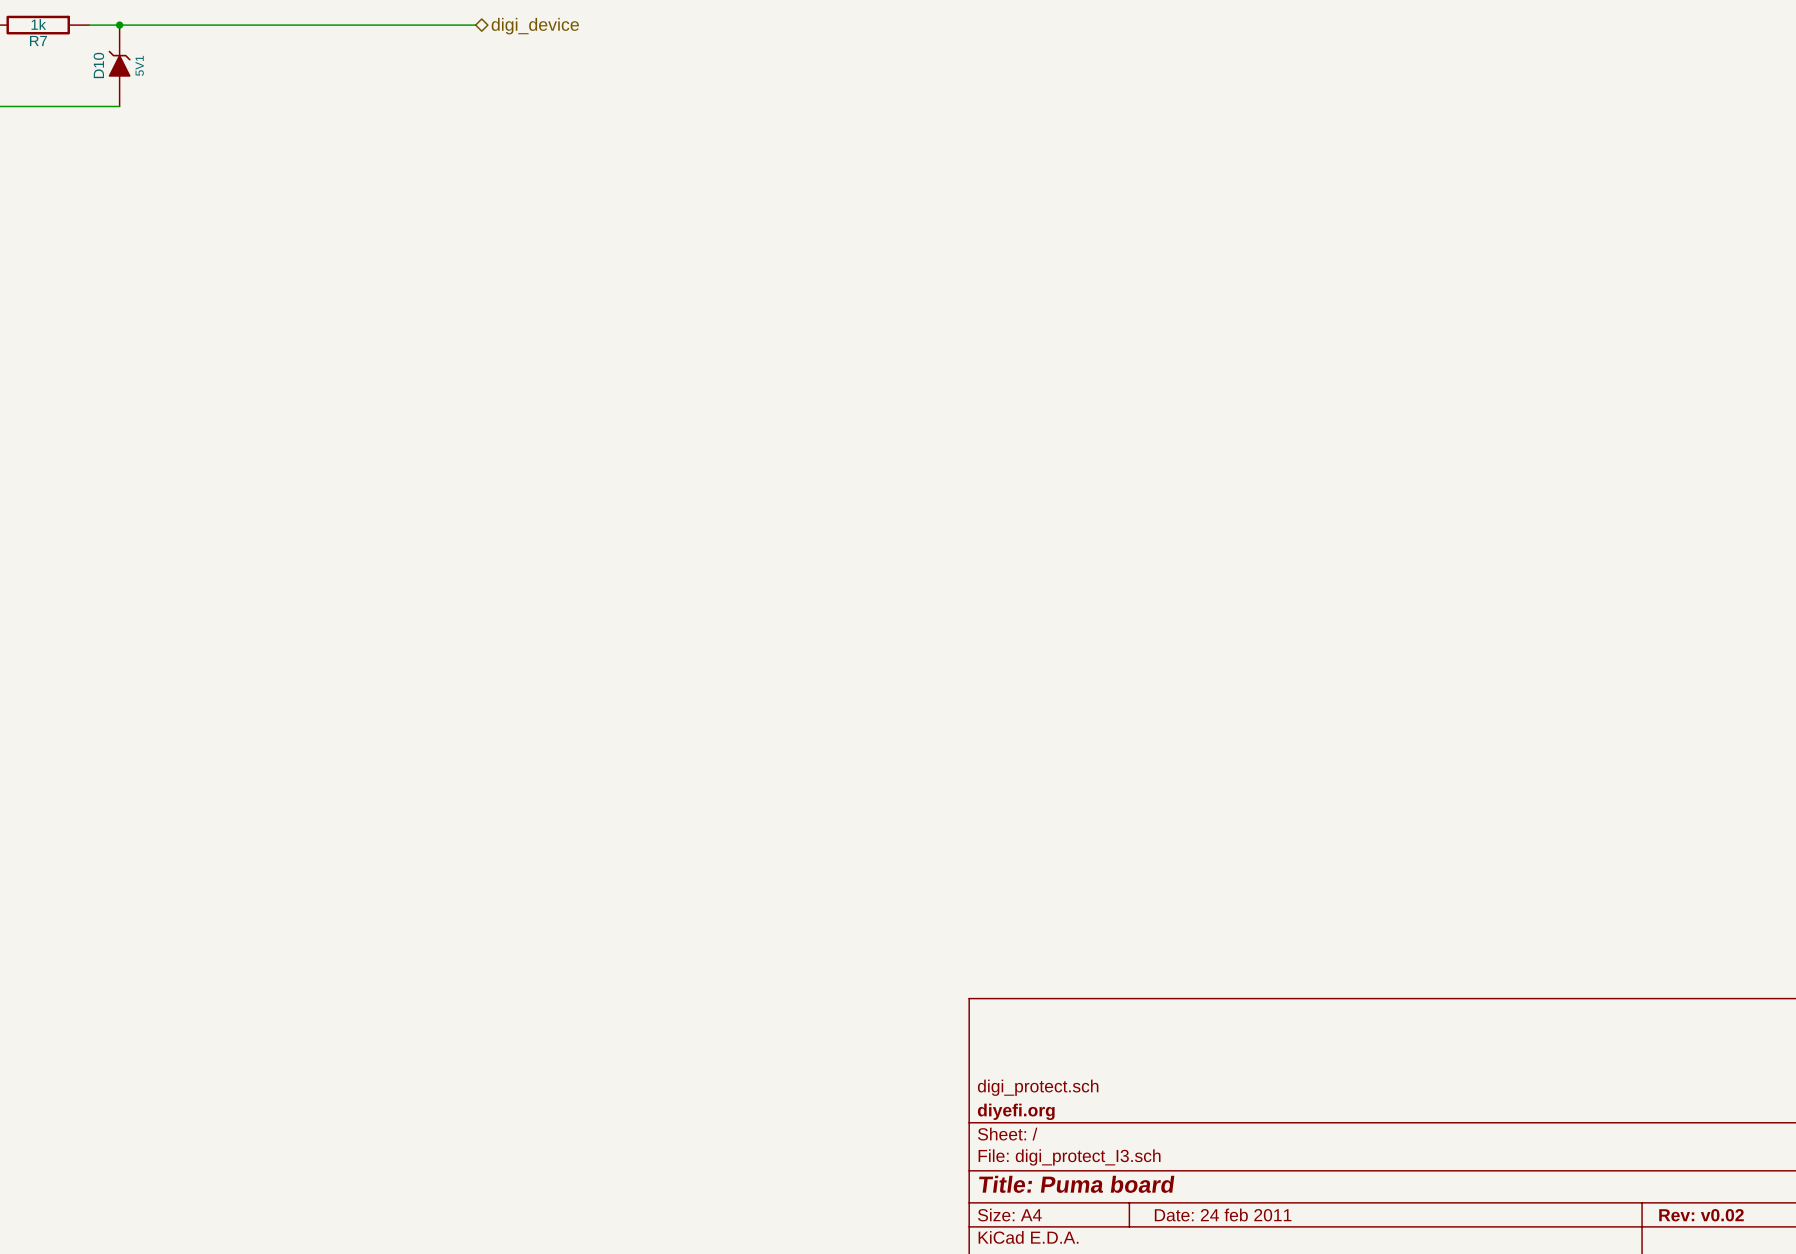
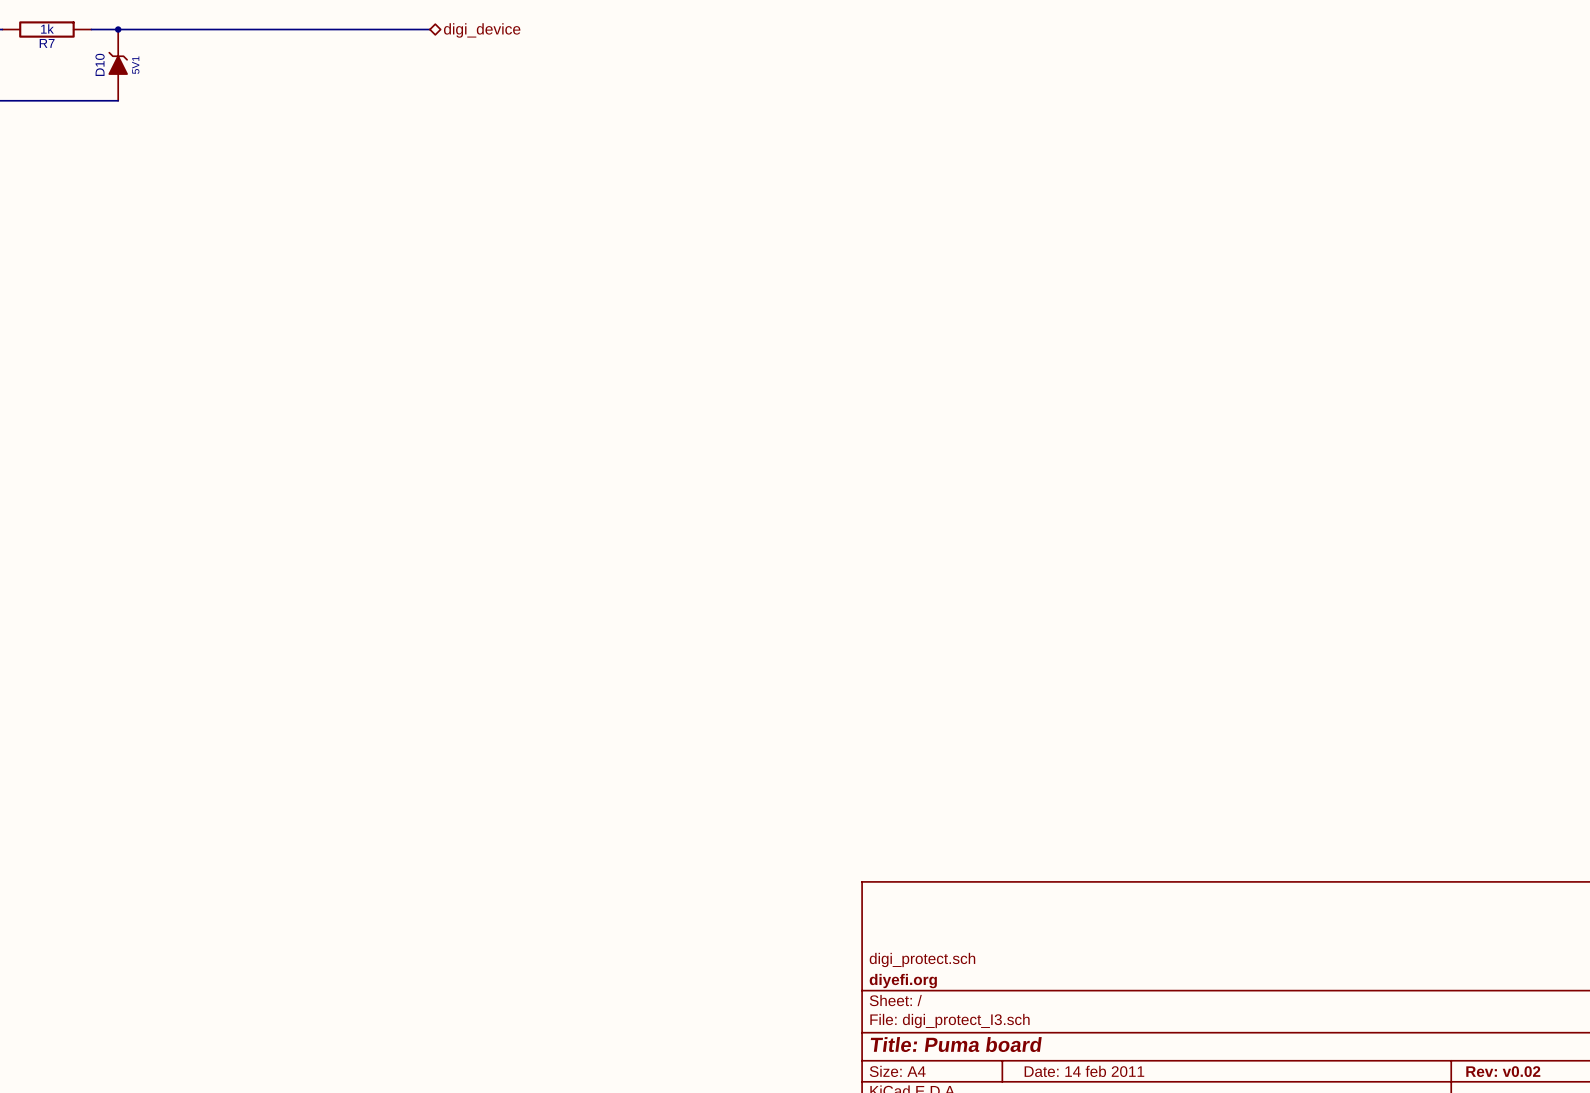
title block: Date: 24 feb 2011 (1223, 1215) -> Date: 14 feb 2011 (1084, 1071)

